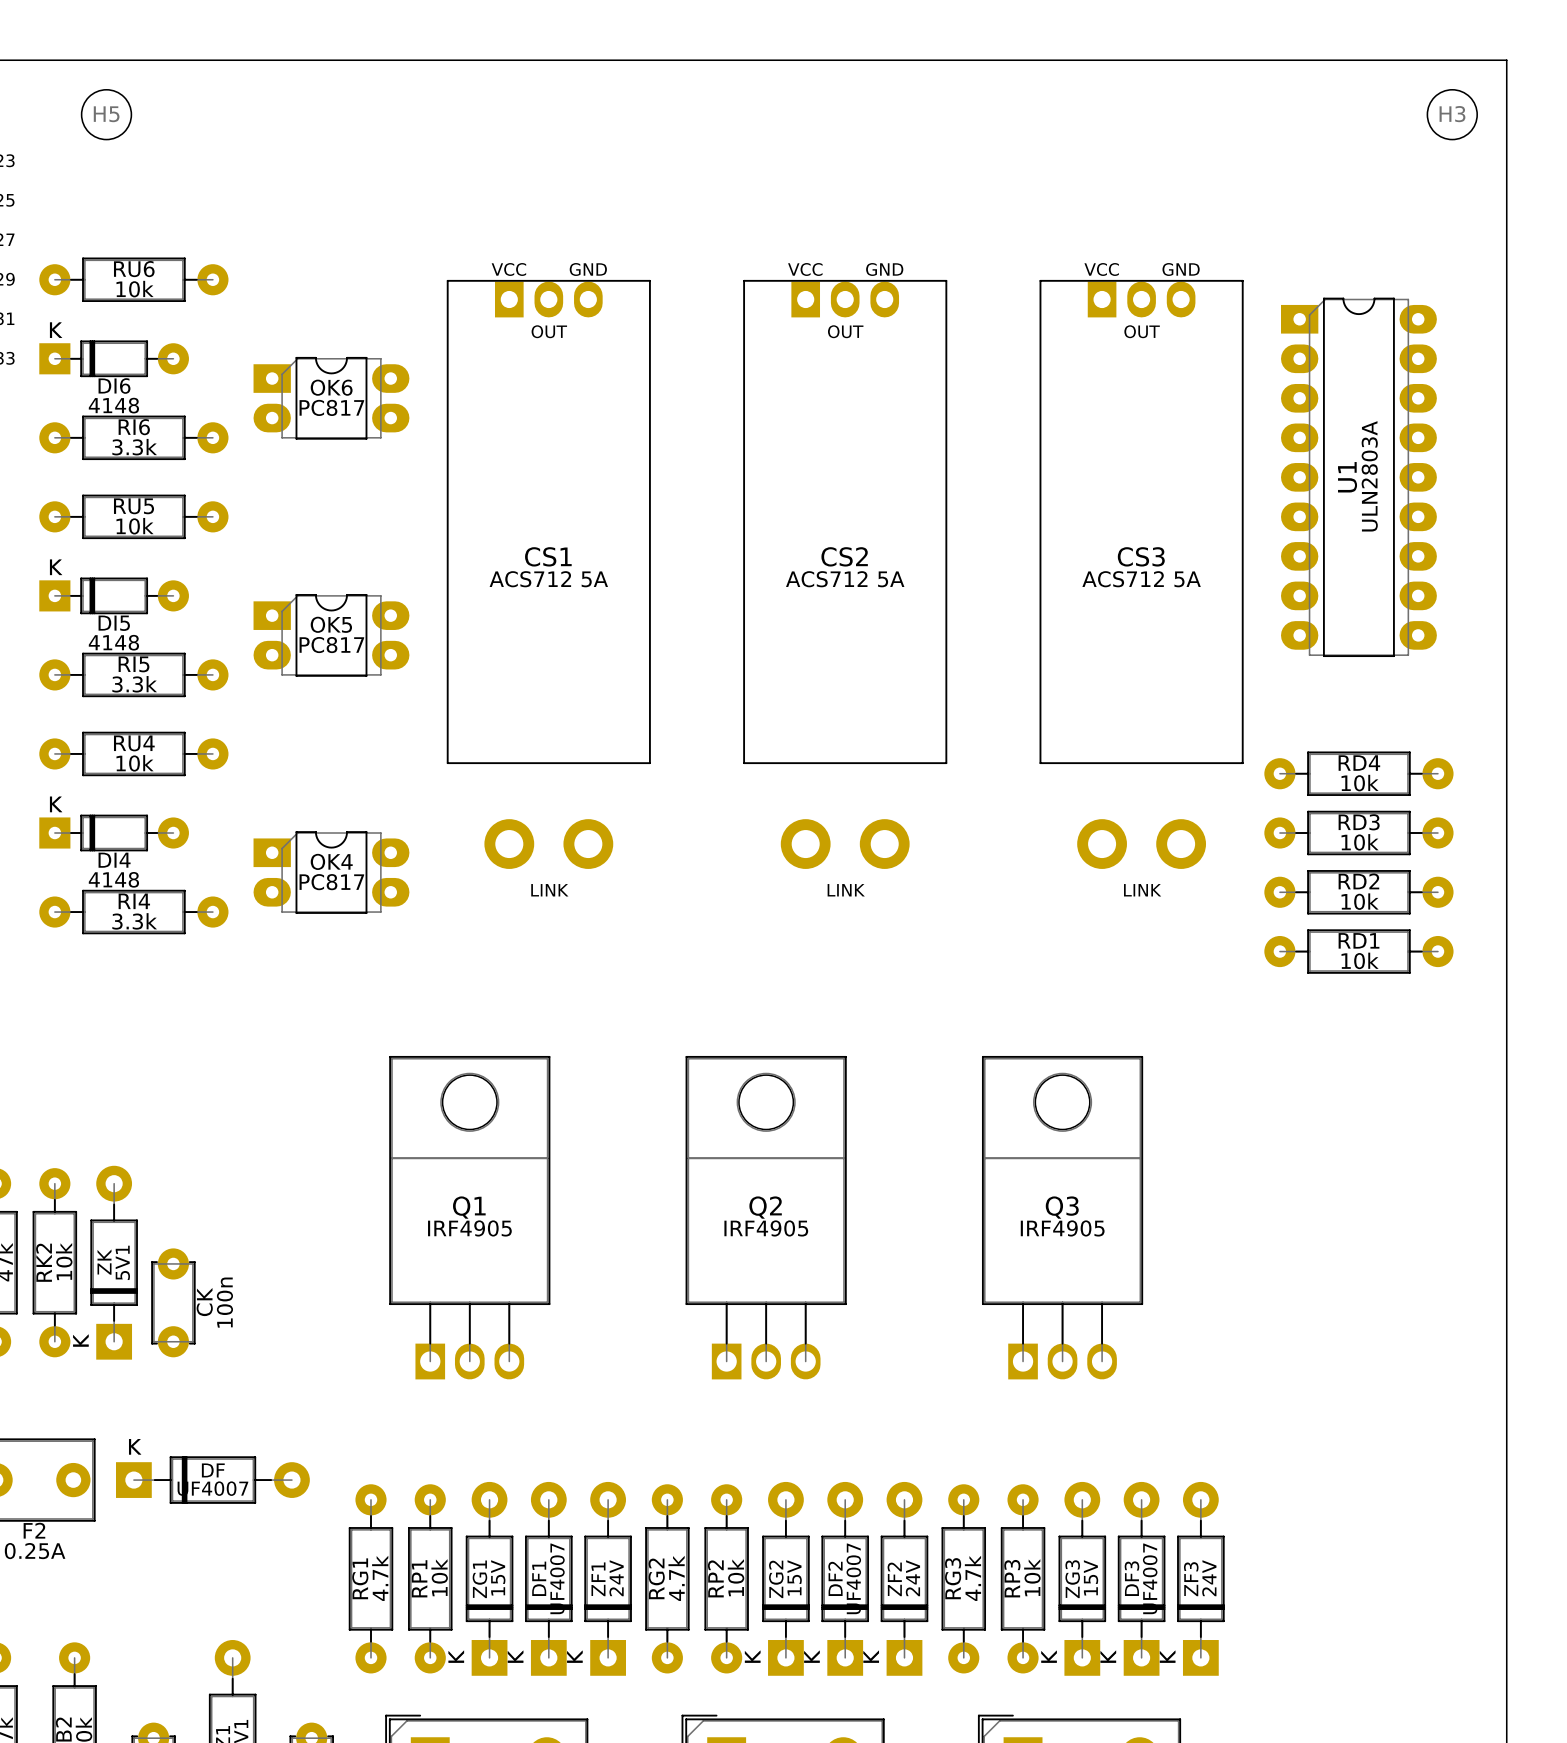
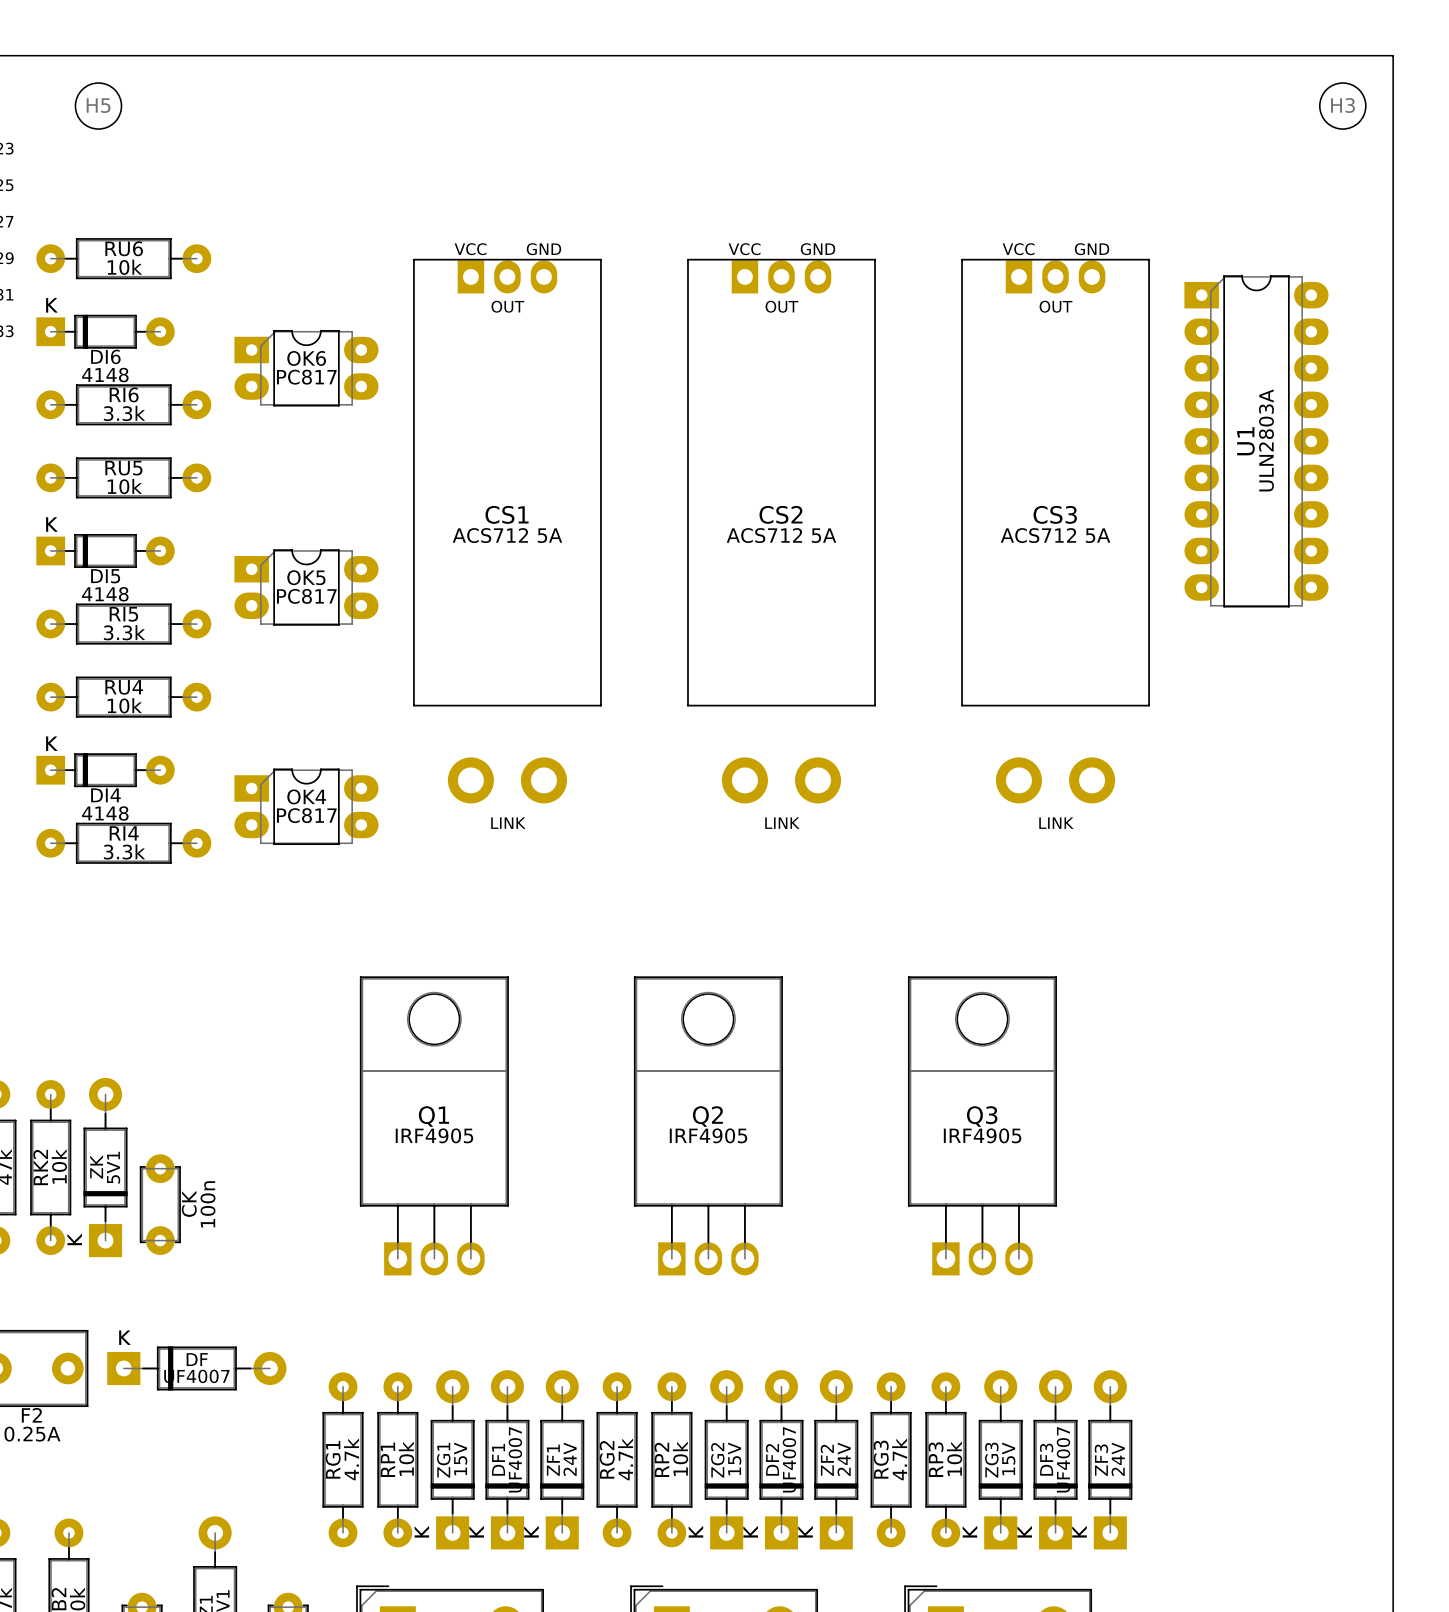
RD4: 10k (1358, 773) -> none
RD3: 10k (1358, 833) -> none
RD2: 10k (1358, 892) -> none
RD1: 10k (1358, 951) -> none

